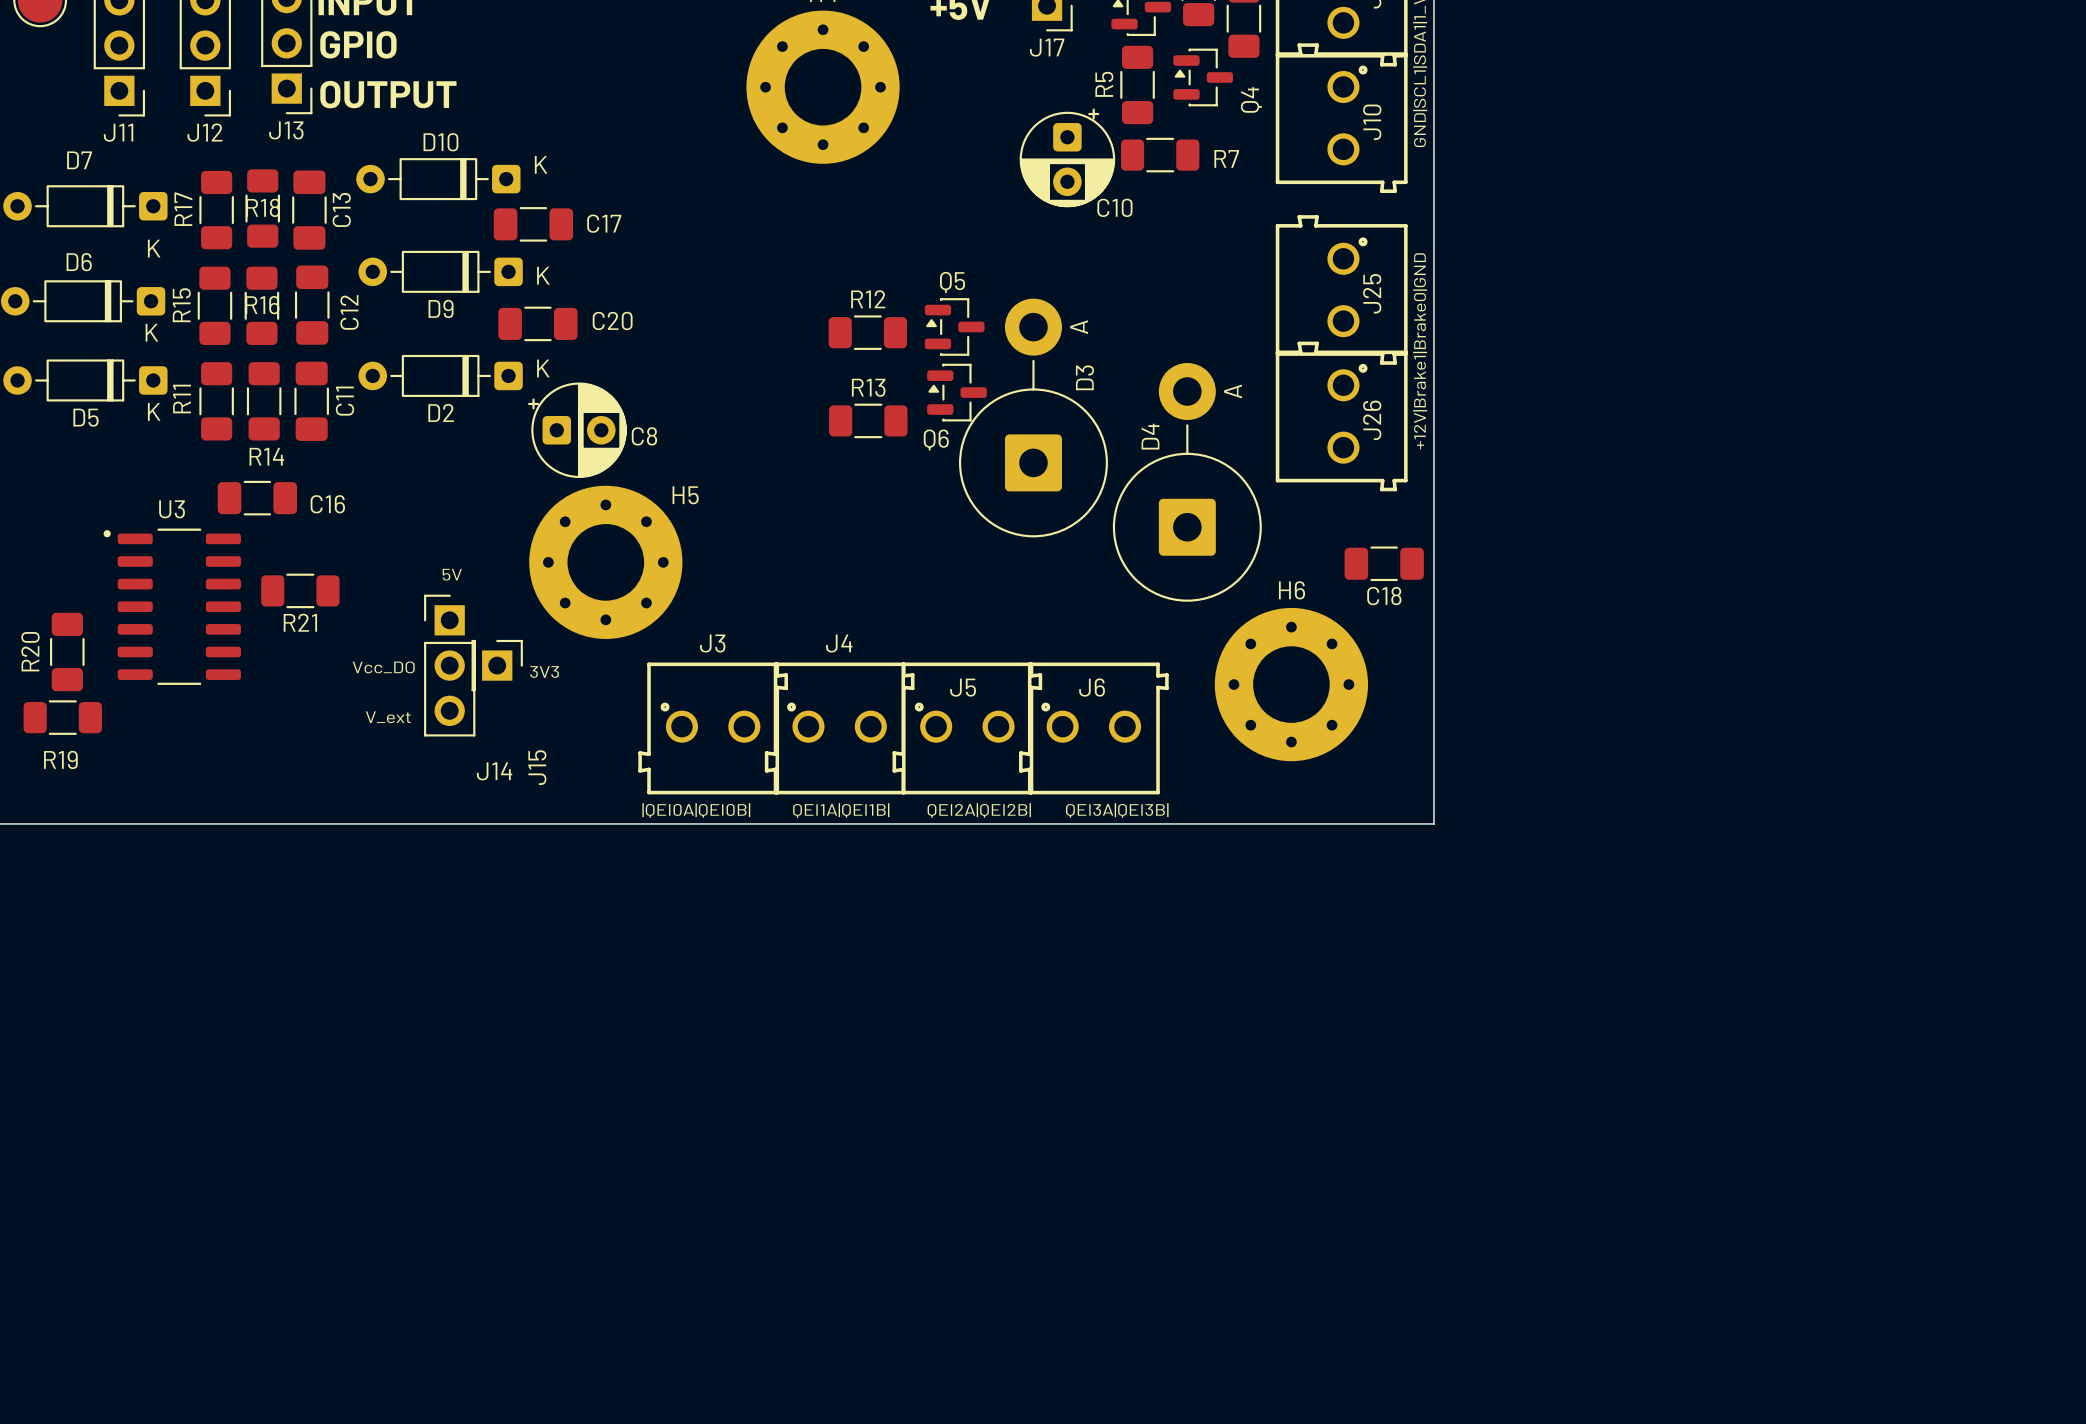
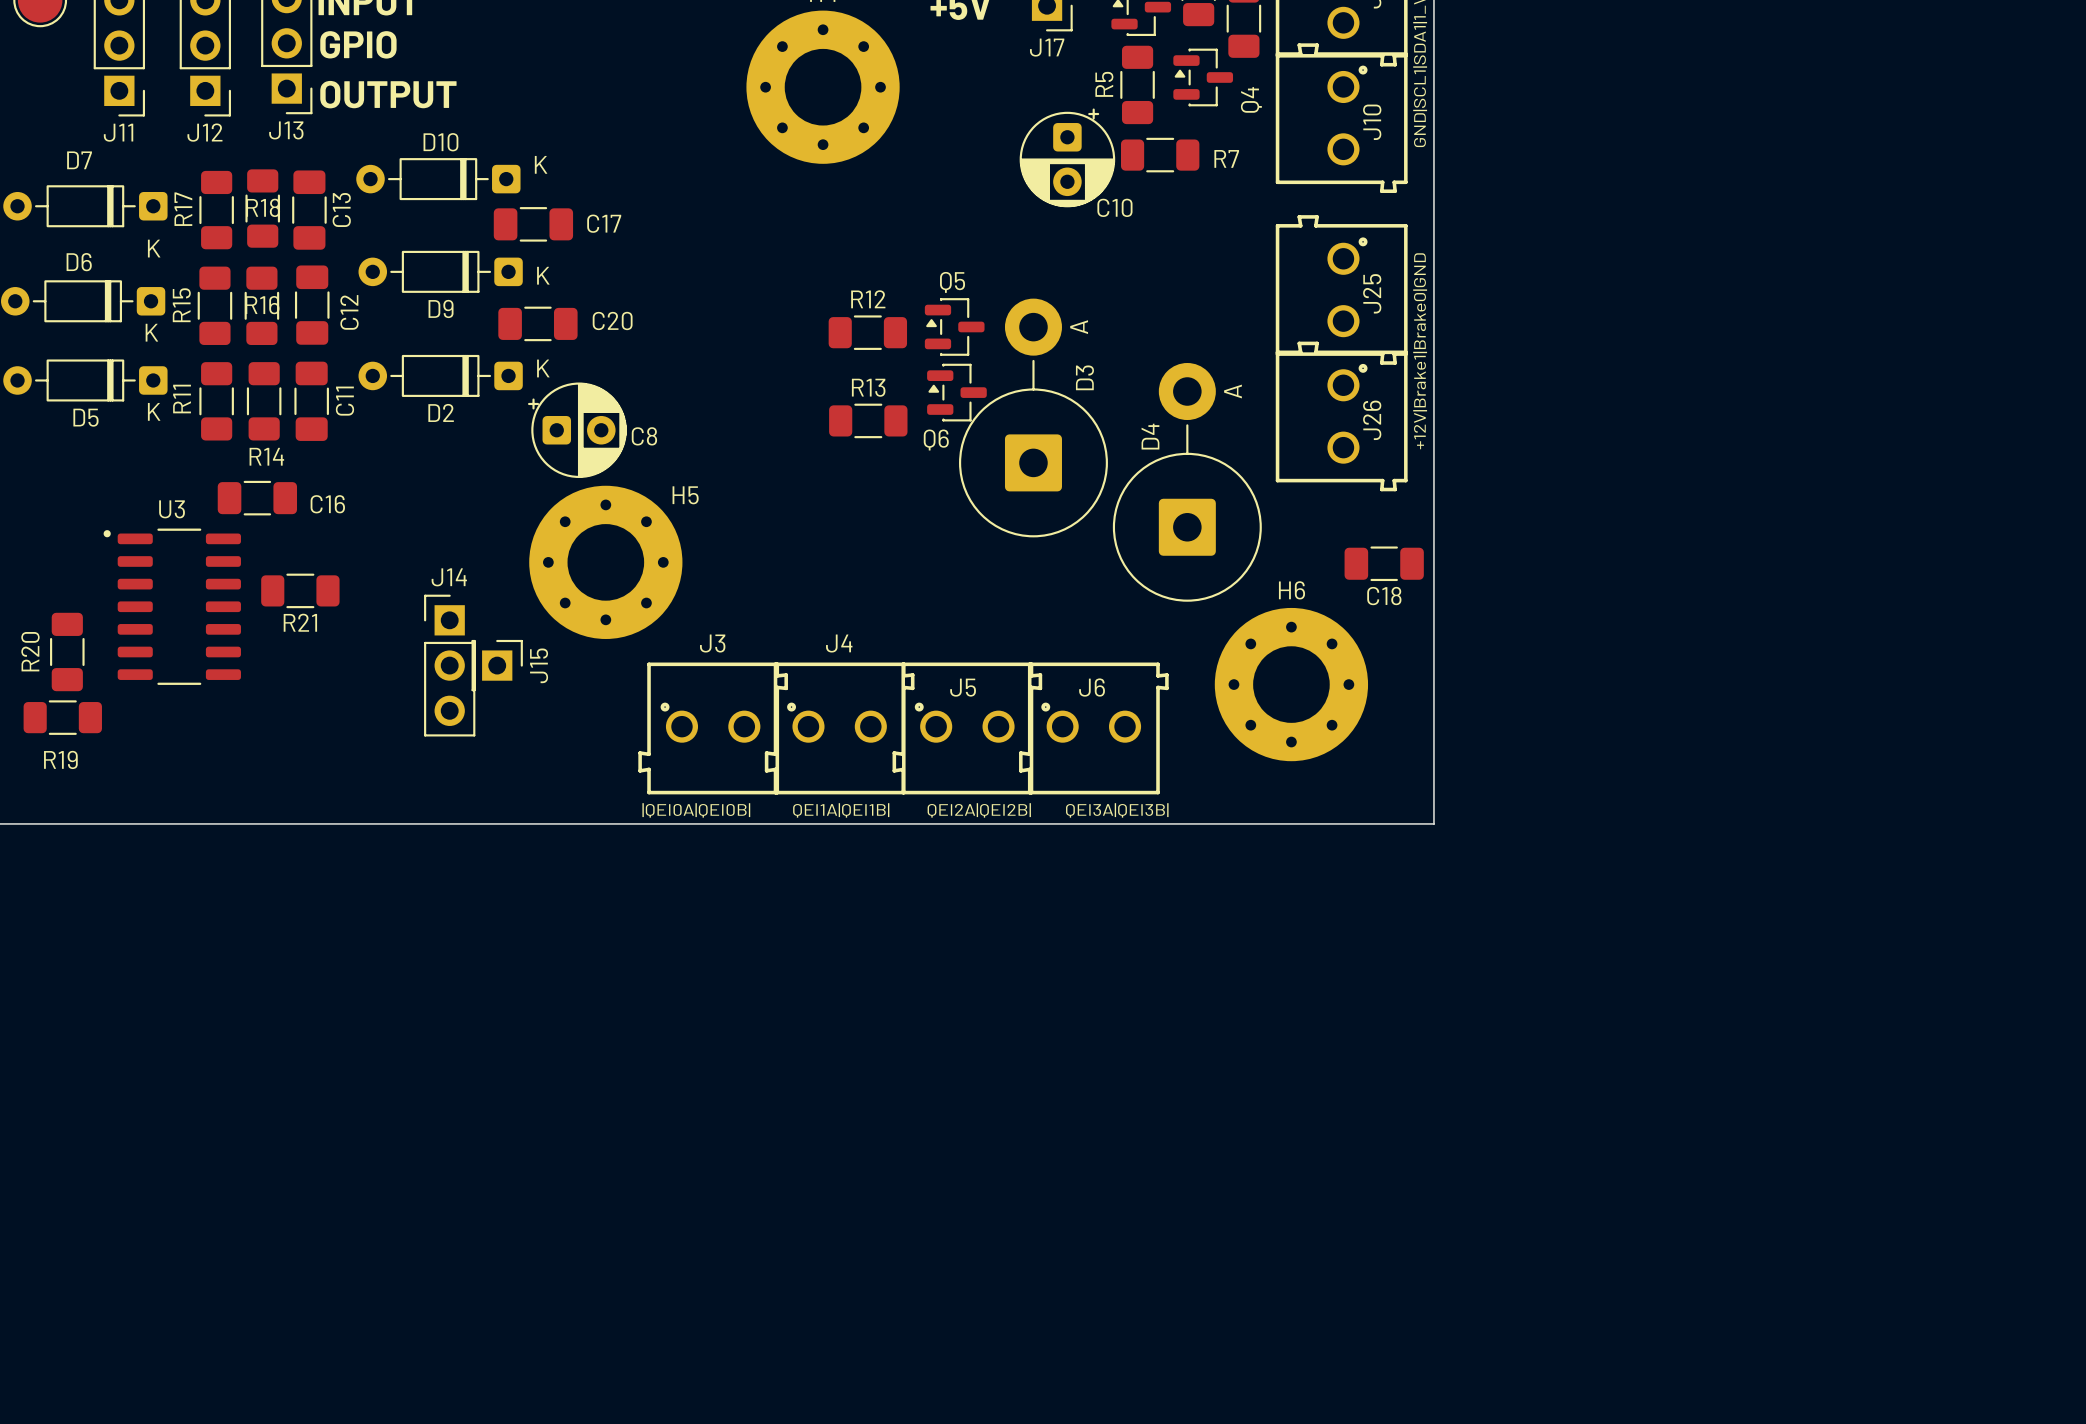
text: 5V (452, 574) -> none
text: Vcc_DO (383, 667) -> none
text: 3V3 (544, 671) -> none
text: V_ext (388, 717) -> none
J15 name position: J15 (537, 767) -> J15 (539, 665)
J14 name position: J14 (494, 771) -> J14 (449, 577)

